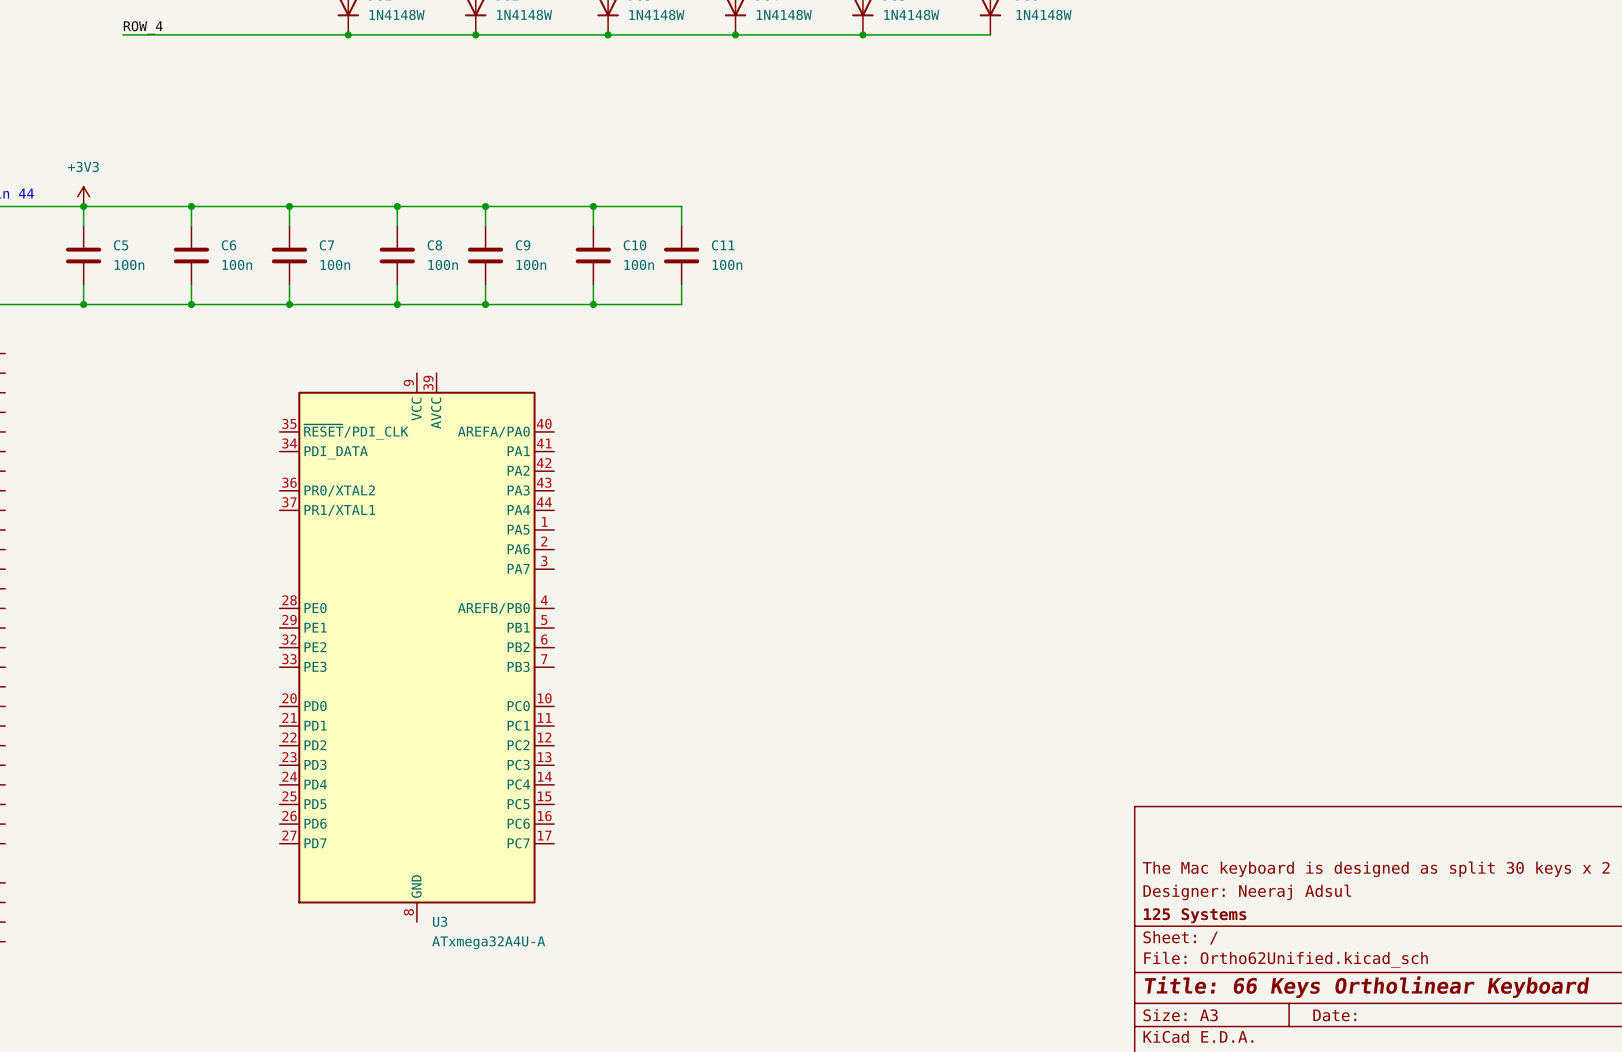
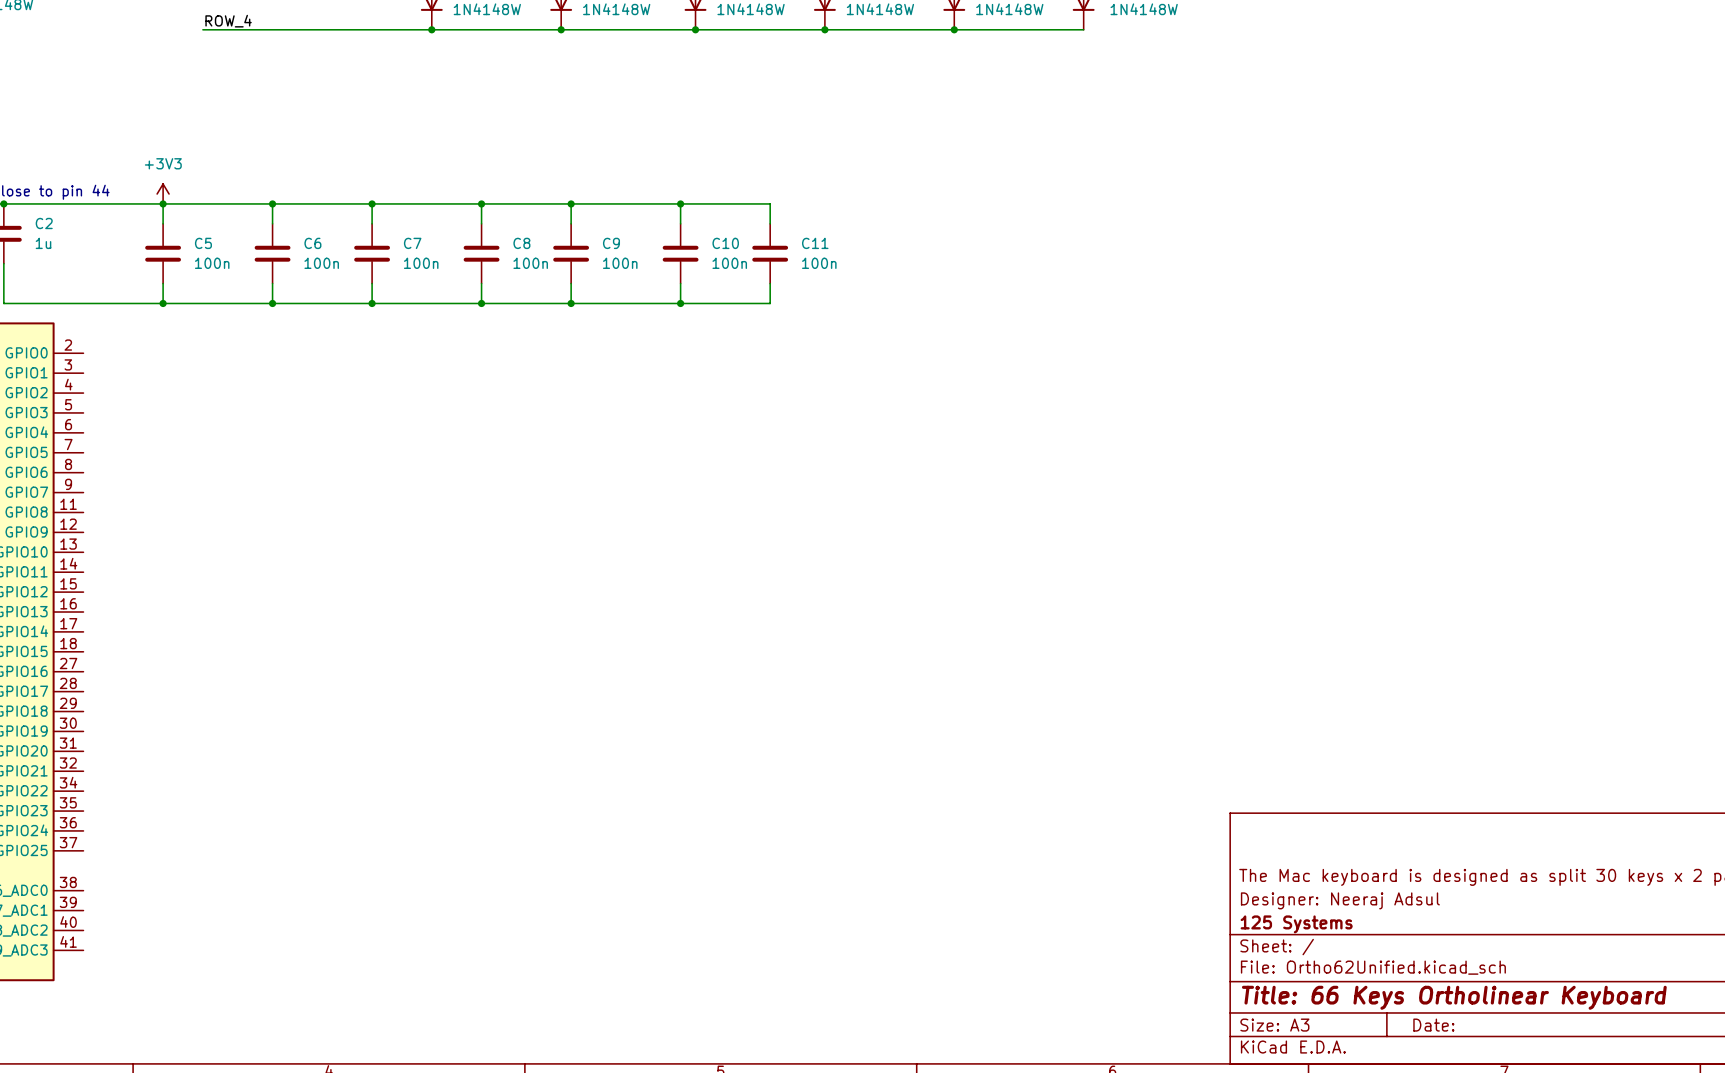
U3: ATxmega32A4U-A (416, 647) -> none

